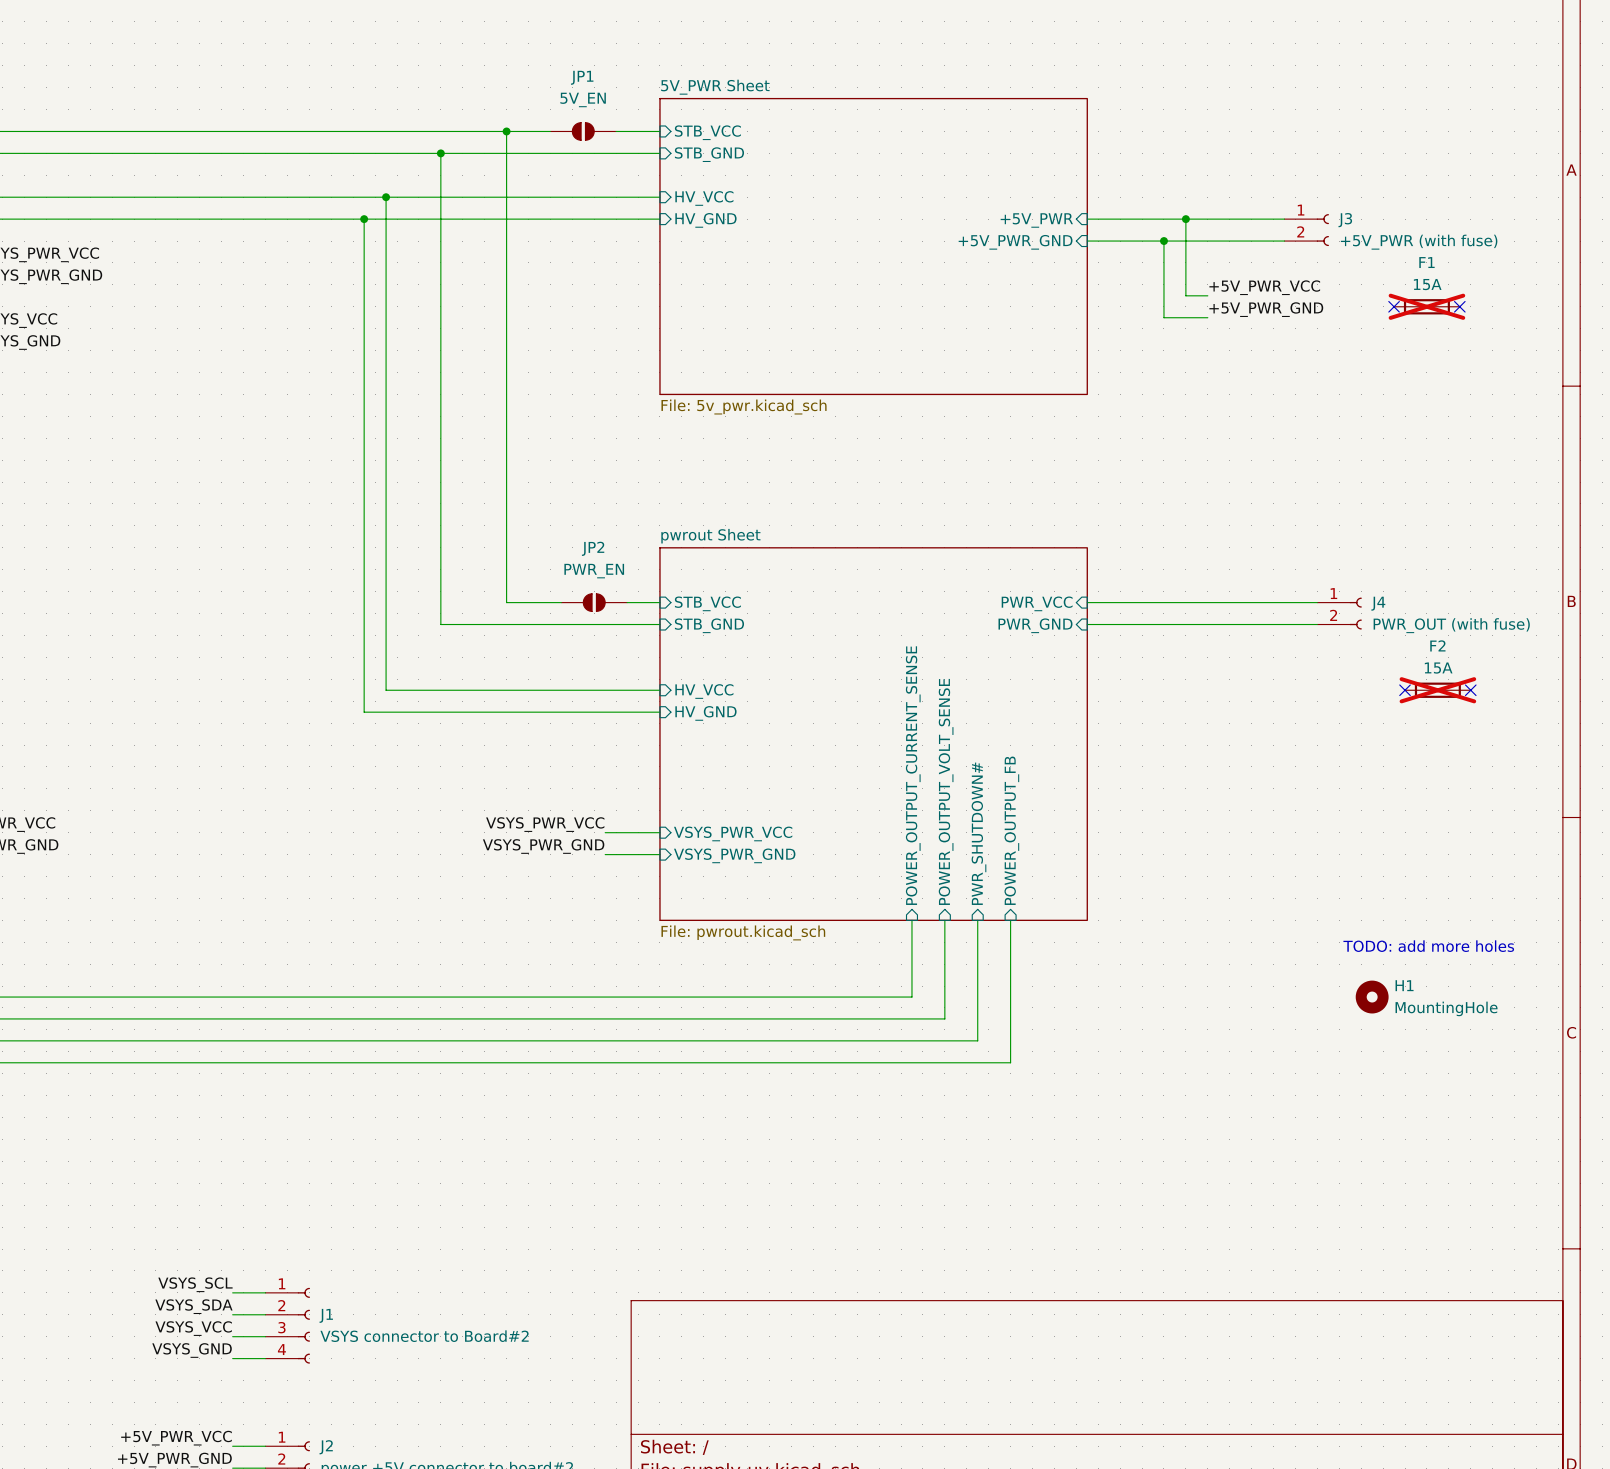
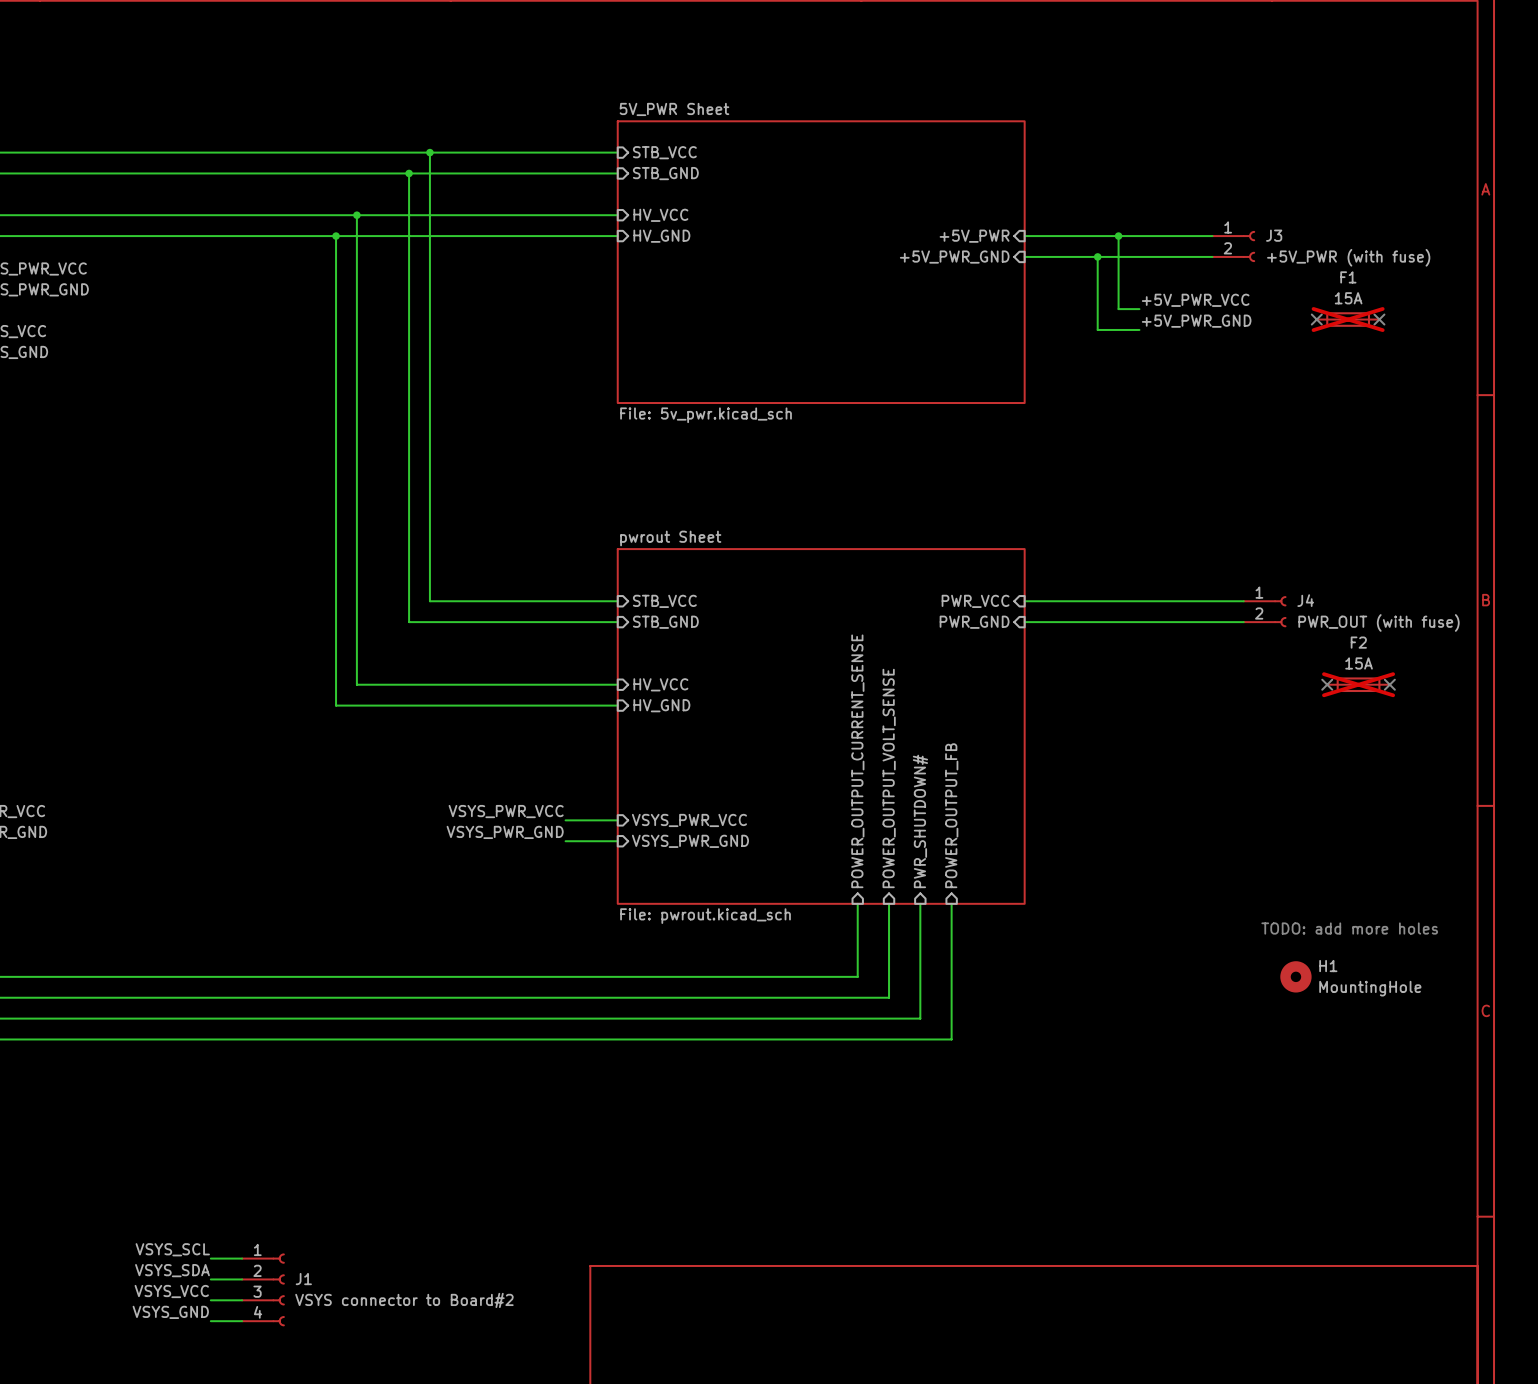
wire: (506, 131) (506, 602) -> (429, 152) (429, 601) (471, 601)
junction position: (506, 131) -> (429, 152)
JP1: 5V_EN (583, 131) -> none
JP2: PWR_EN (594, 602) -> none

